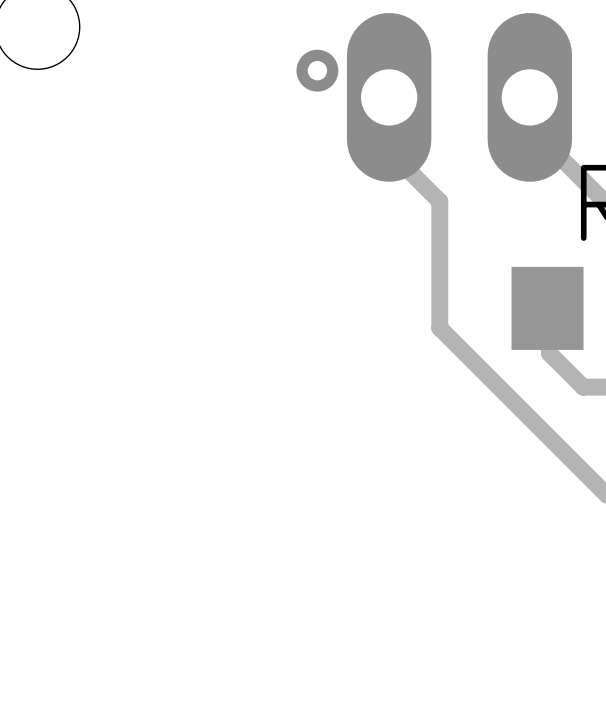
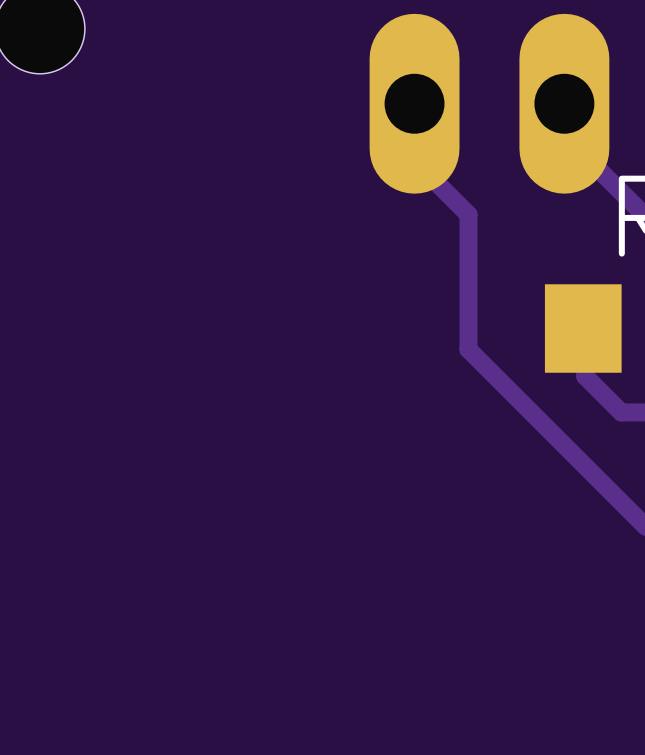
via: (317, 70) -> none

